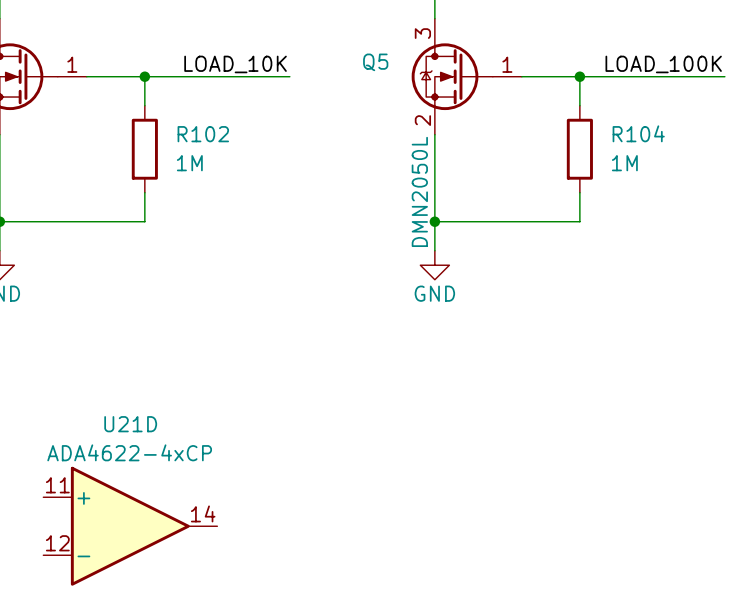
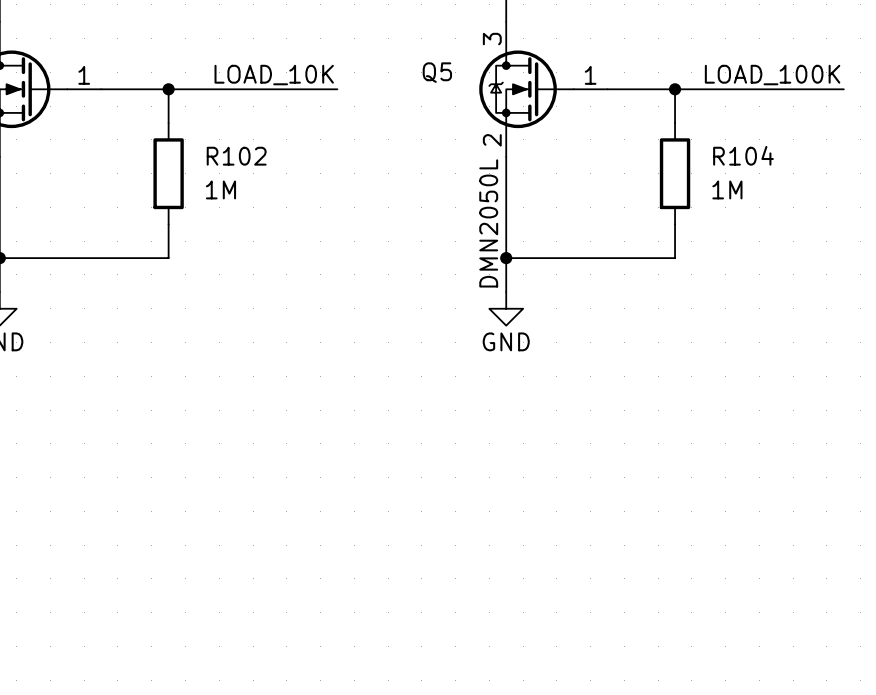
U21D: ADA4622-4xCP (130, 526) -> none

